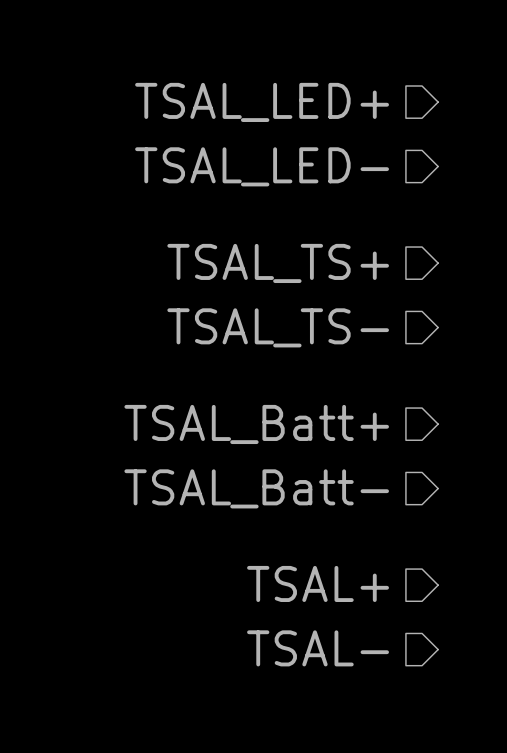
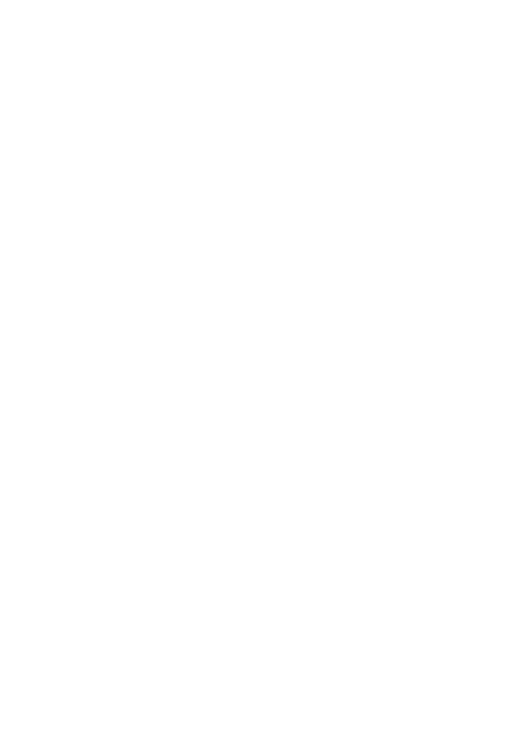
hierarchical label: TSAL_LED+ (262, 102) -> none
hierarchical label: TSAL_LED- (262, 166) -> none
hierarchical label: TSAL_TS+ (278, 263) -> none
hierarchical label: TSAL_TS- (278, 327) -> none
hierarchical label: TSAL_Batt+ (256, 424) -> none
hierarchical label: TSAL_Batt- (256, 488) -> none
hierarchical label: TSAL+ (318, 583) -> none
hierarchical label: TSAL- (318, 648) -> none

